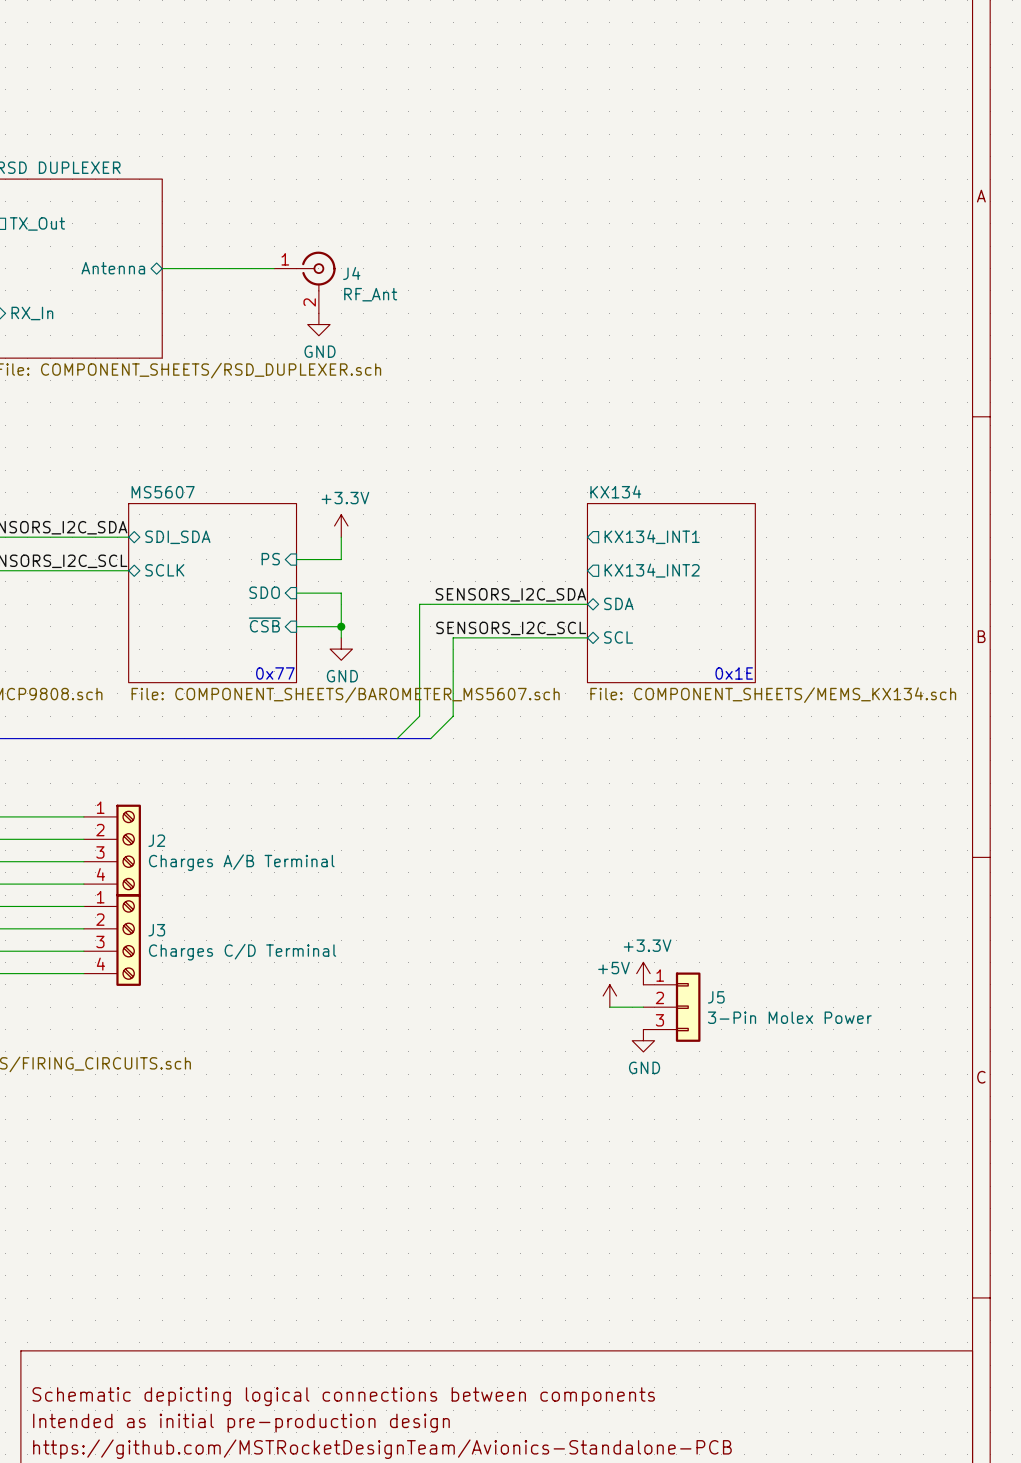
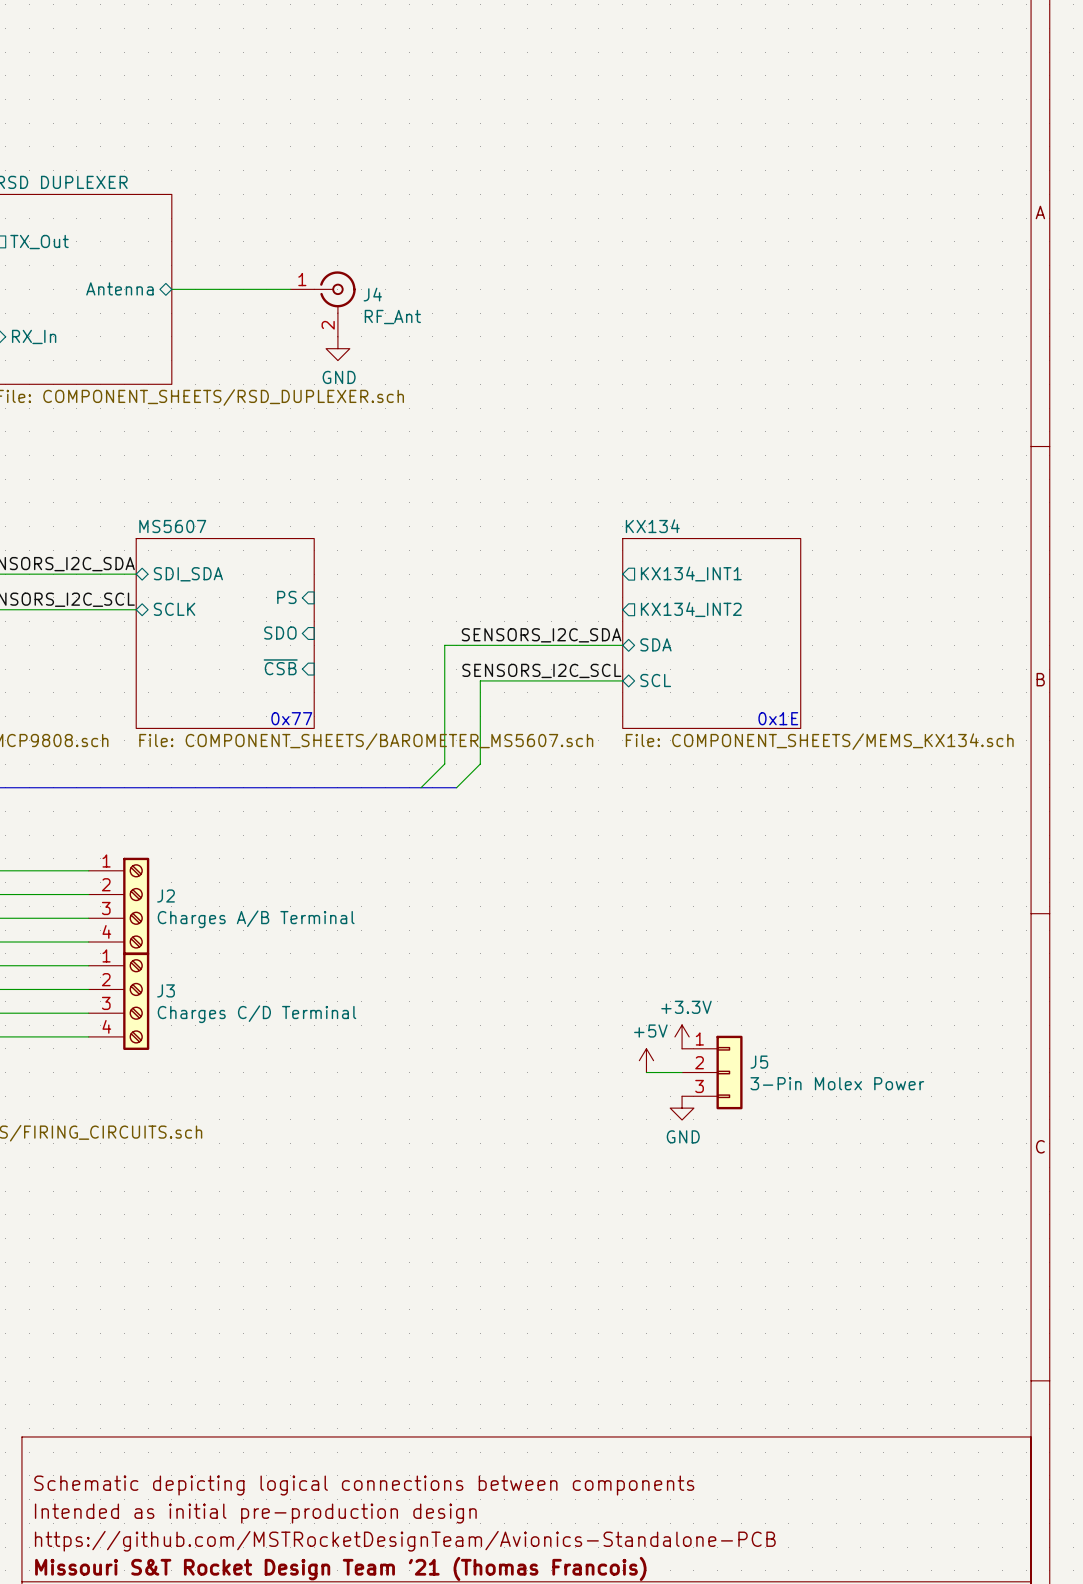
power symbol: +3.3V (341, 525) -> none
wire: (341, 537) (341, 559) (296, 559) -> none
wire: (296, 593) (341, 593) (341, 637) -> none
wire: (296, 626) (341, 626) -> none
junction: (341, 626) -> none
power symbol: GND (341, 649) -> none

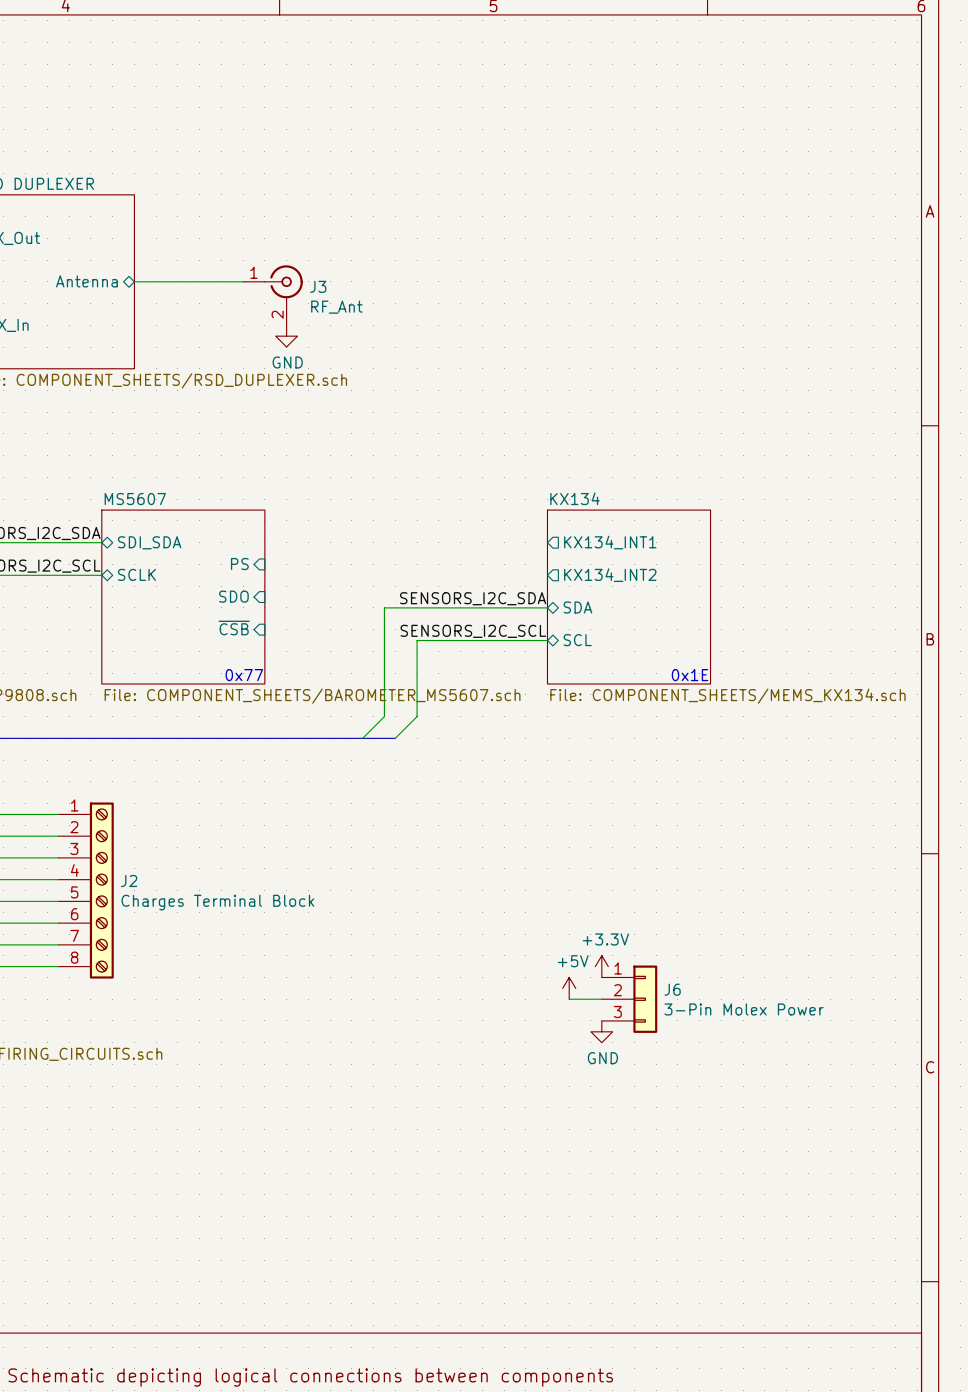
J4 name: J4 (372, 294) -> J3 (318, 286)
J2 symbol: [88, 857, 150, 956] -> [58, 802, 114, 979]
J2 value: Charges A/B Terminal (256, 919) -> Charges Terminal Block (217, 902)
J3: Charges C/D Terminal (119, 1001) -> none
J5 name: J5 (759, 1062) -> J6 (672, 989)

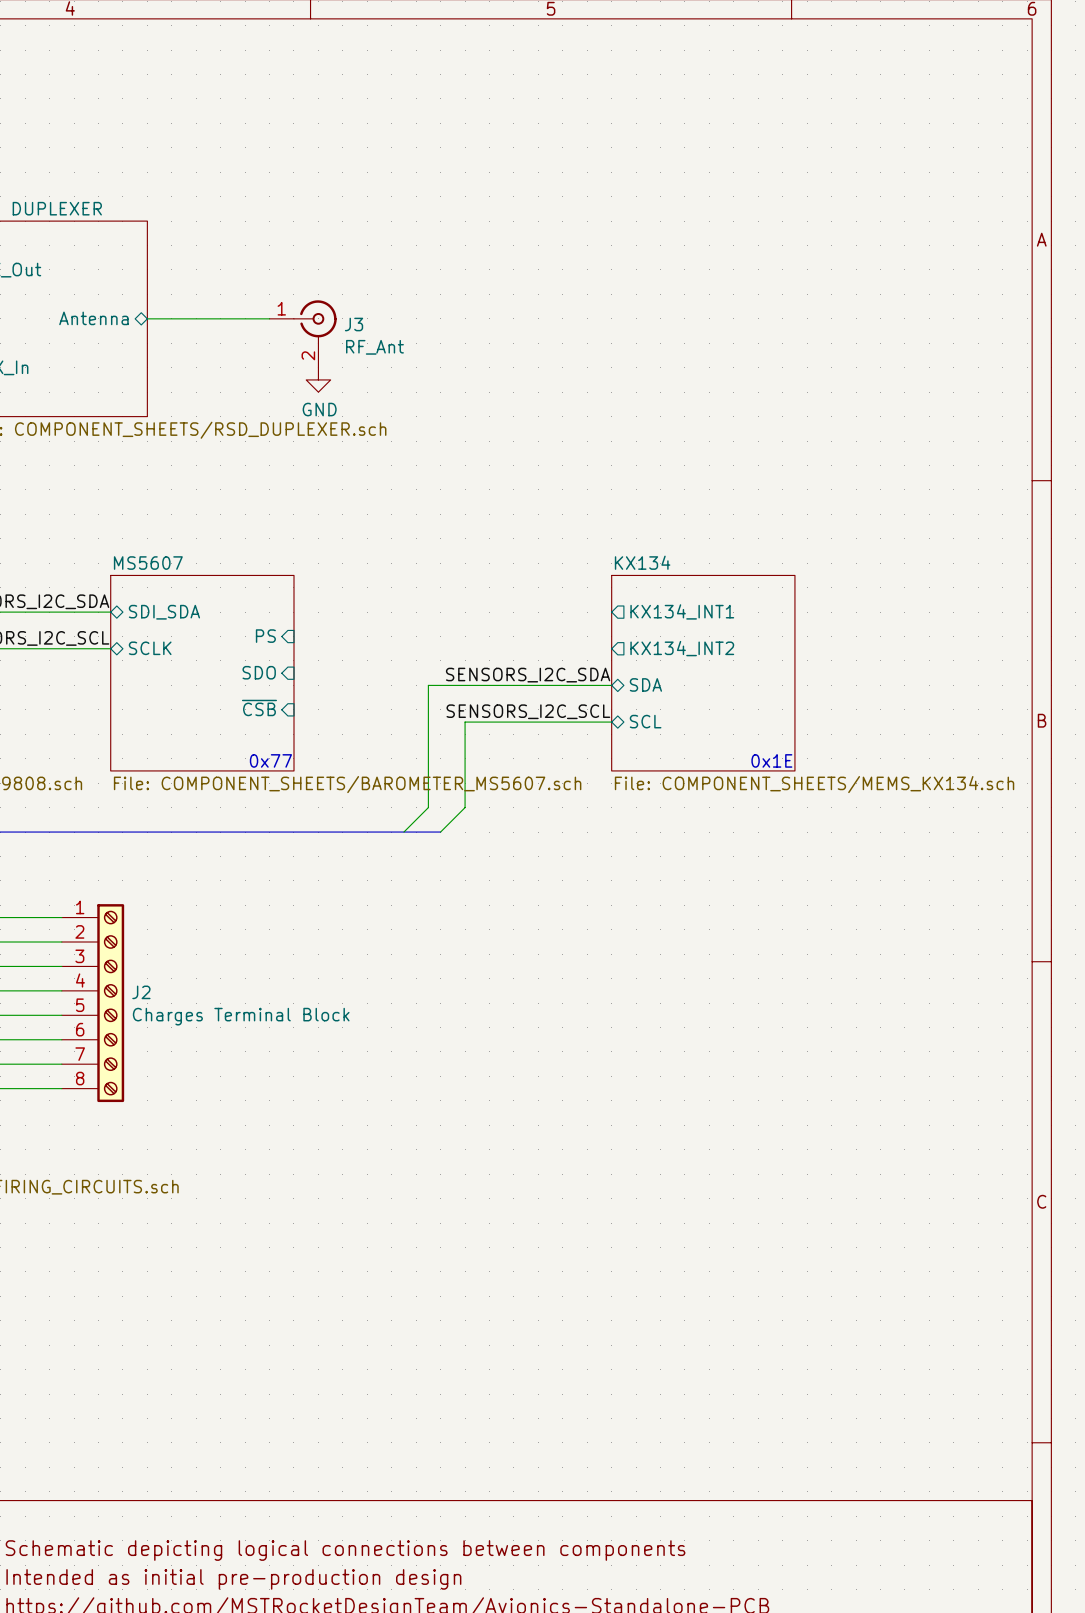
power symbol: +3.3V (601, 966) -> none
power symbol: +5V (569, 988) -> none
wire: (569, 999) (601, 999) -> none
J6: 3-Pin Molex Power (629, 999) -> none
power symbol: GND (601, 1031) -> none

